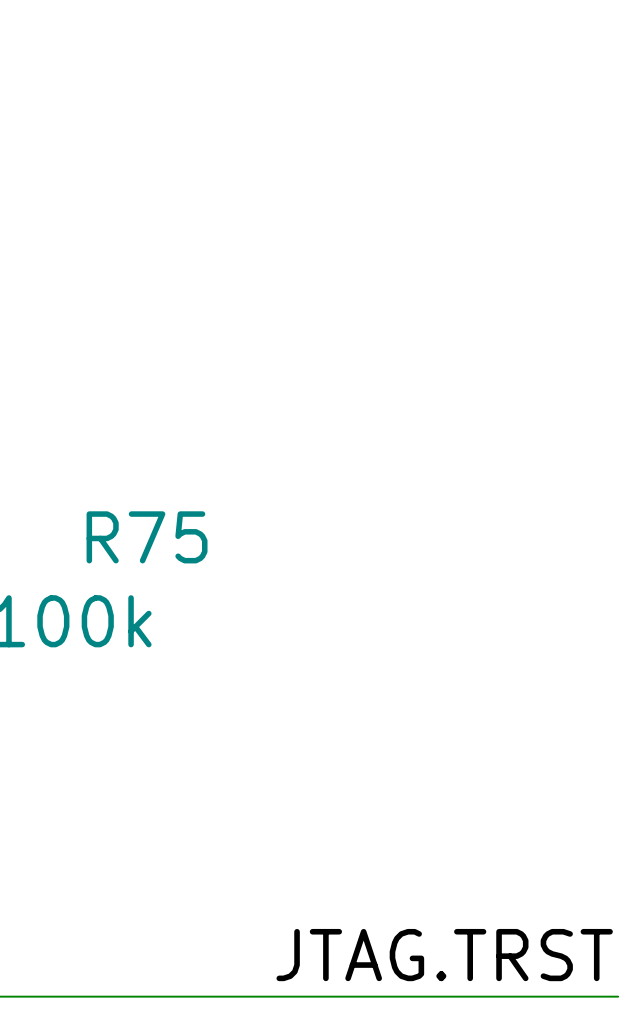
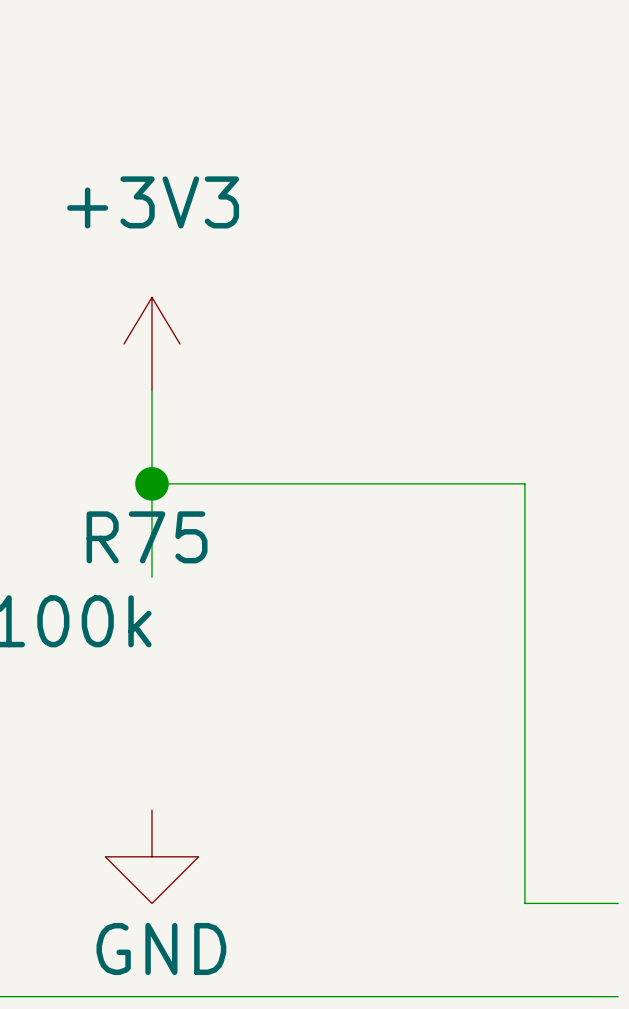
power symbol: none -> +3V3 (151, 344)
wire: none -> (151, 390) (151, 577)
wire: none -> (151, 483) (524, 483) (524, 903) (618, 903)
junction: none -> (151, 483)
power symbol: none -> GND (151, 856)
label: JTAG.TRST (444, 955) -> none

